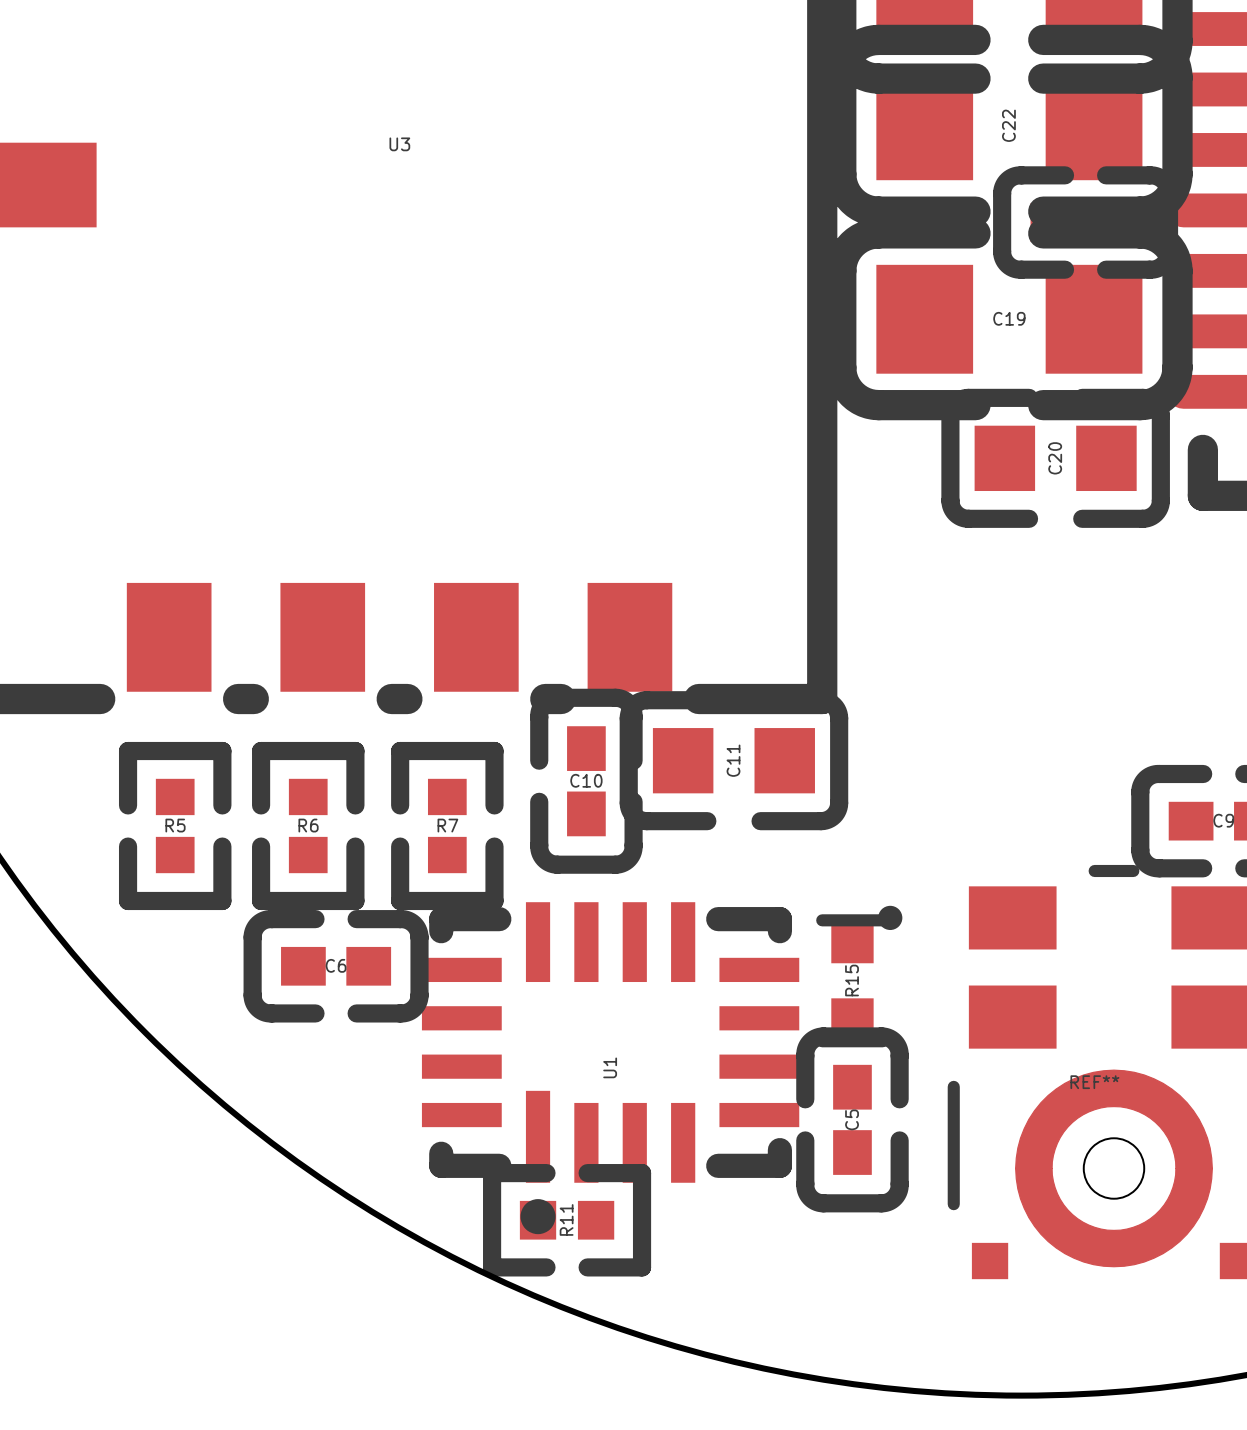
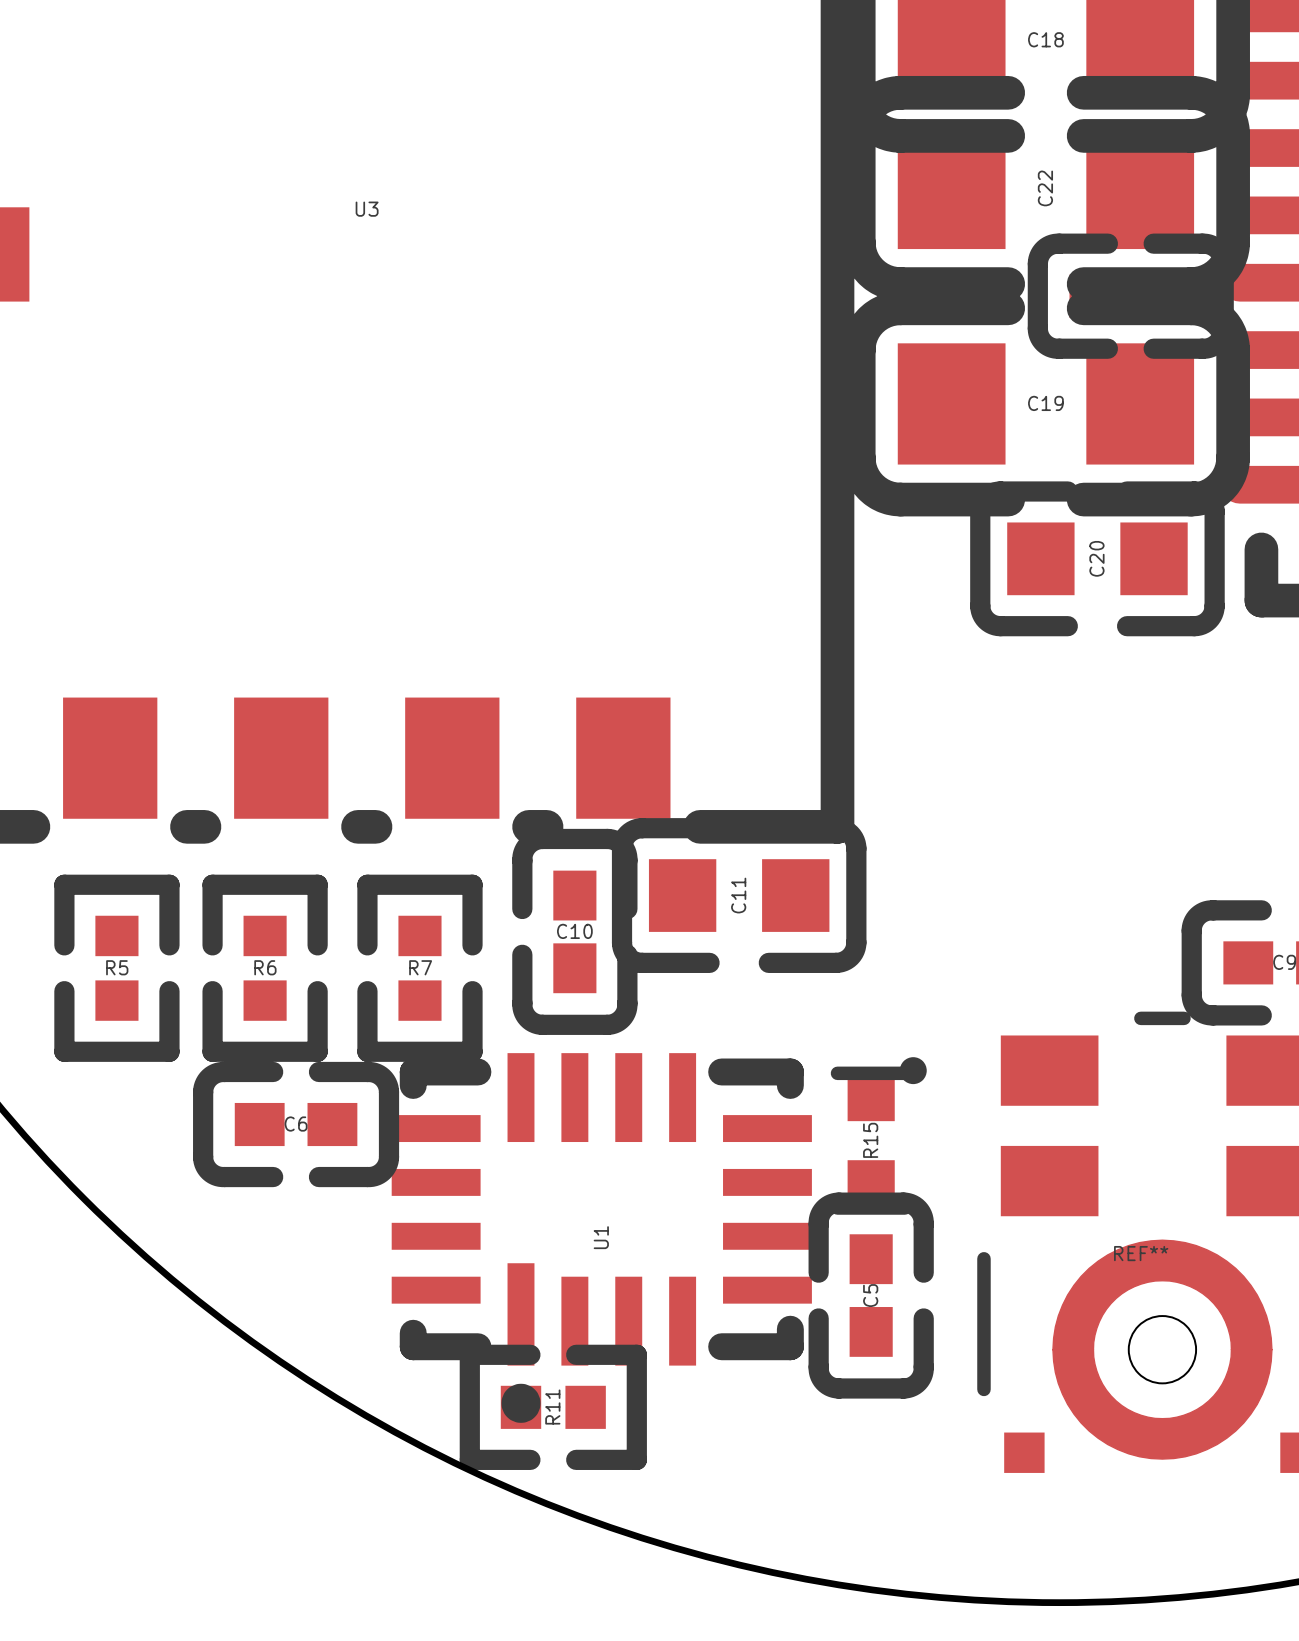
C10 position: (586, 781) -> (574, 931)

